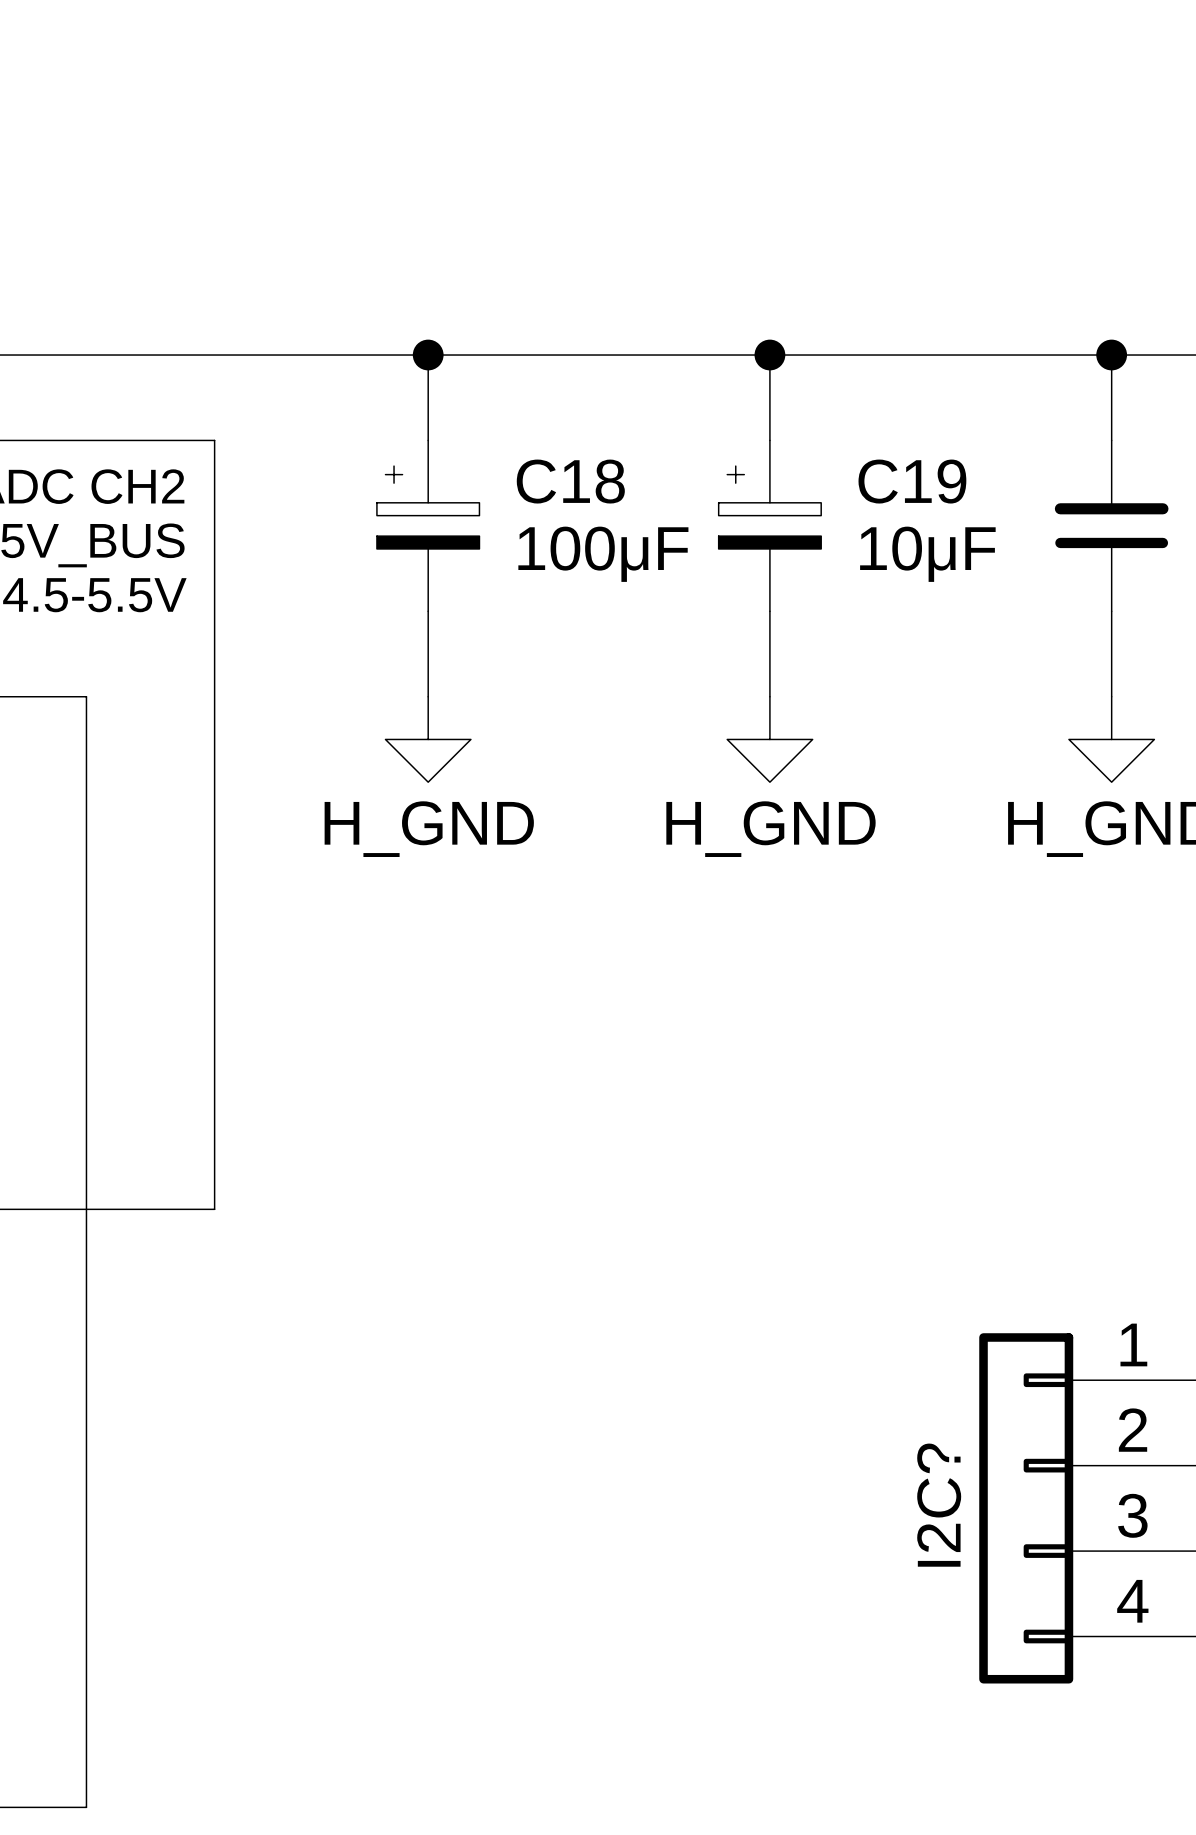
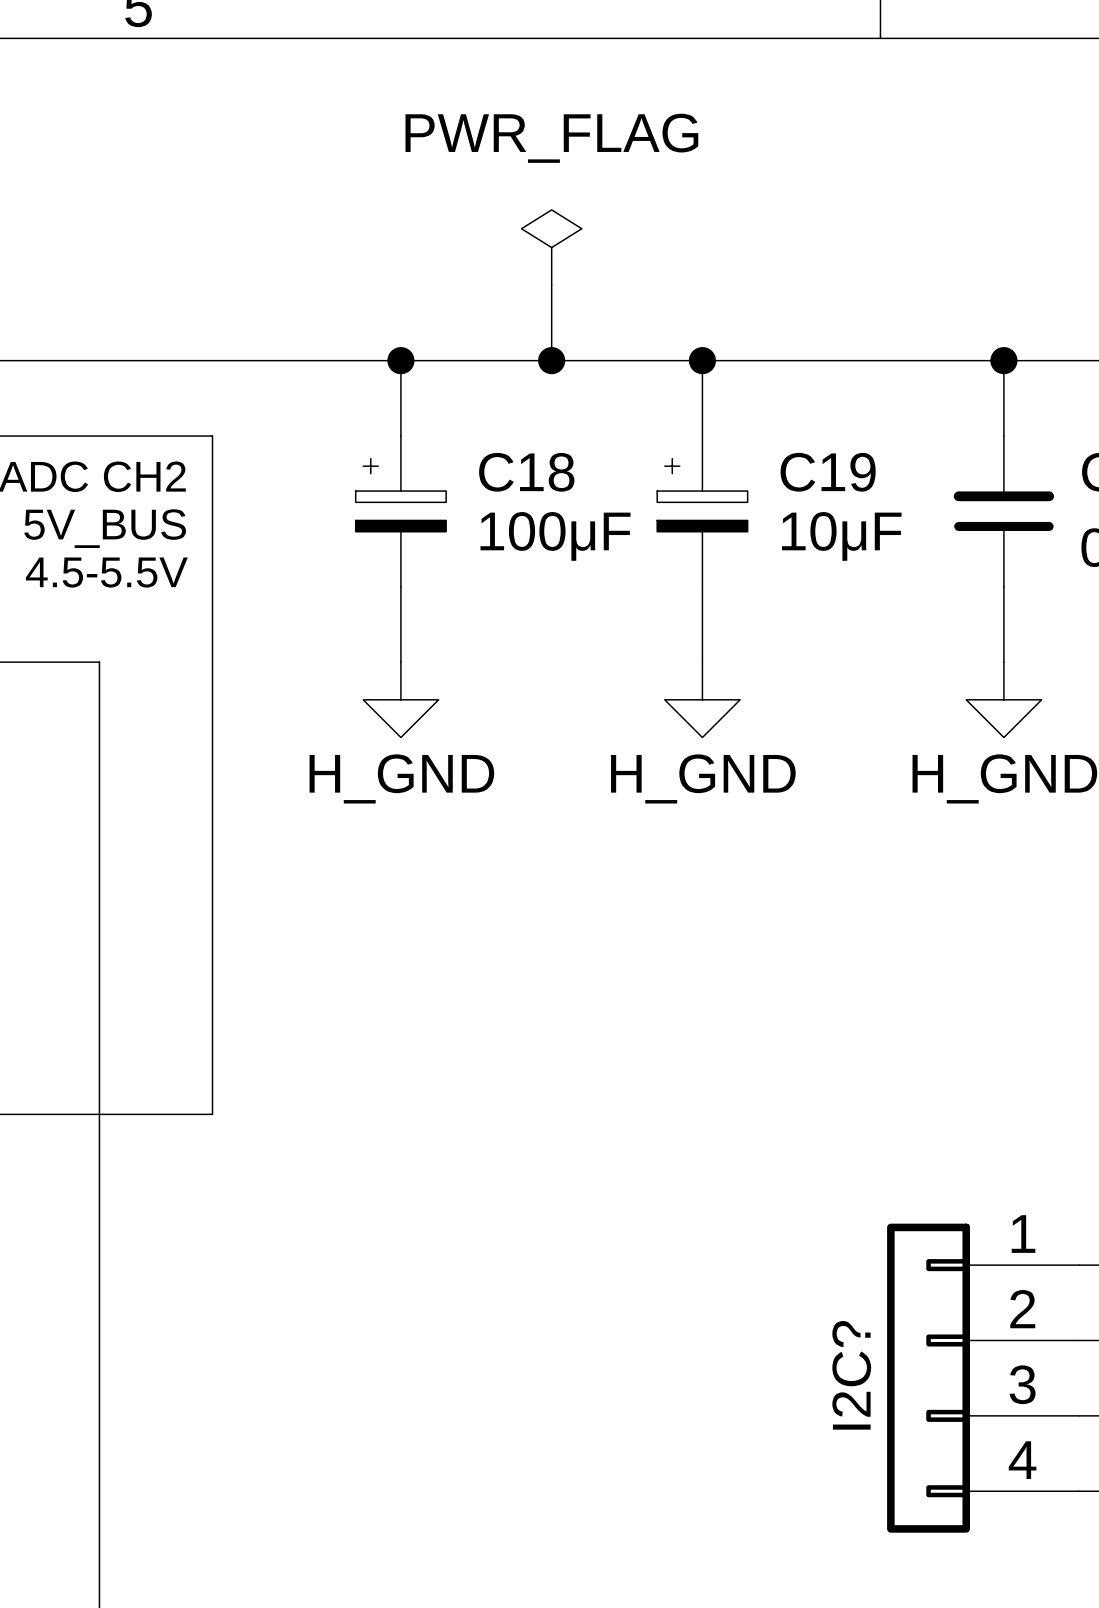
power symbol: none -> PWR_FLAG (551, 247)
wire: none -> (551, 285) (551, 360)
junction: none -> (551, 360)

